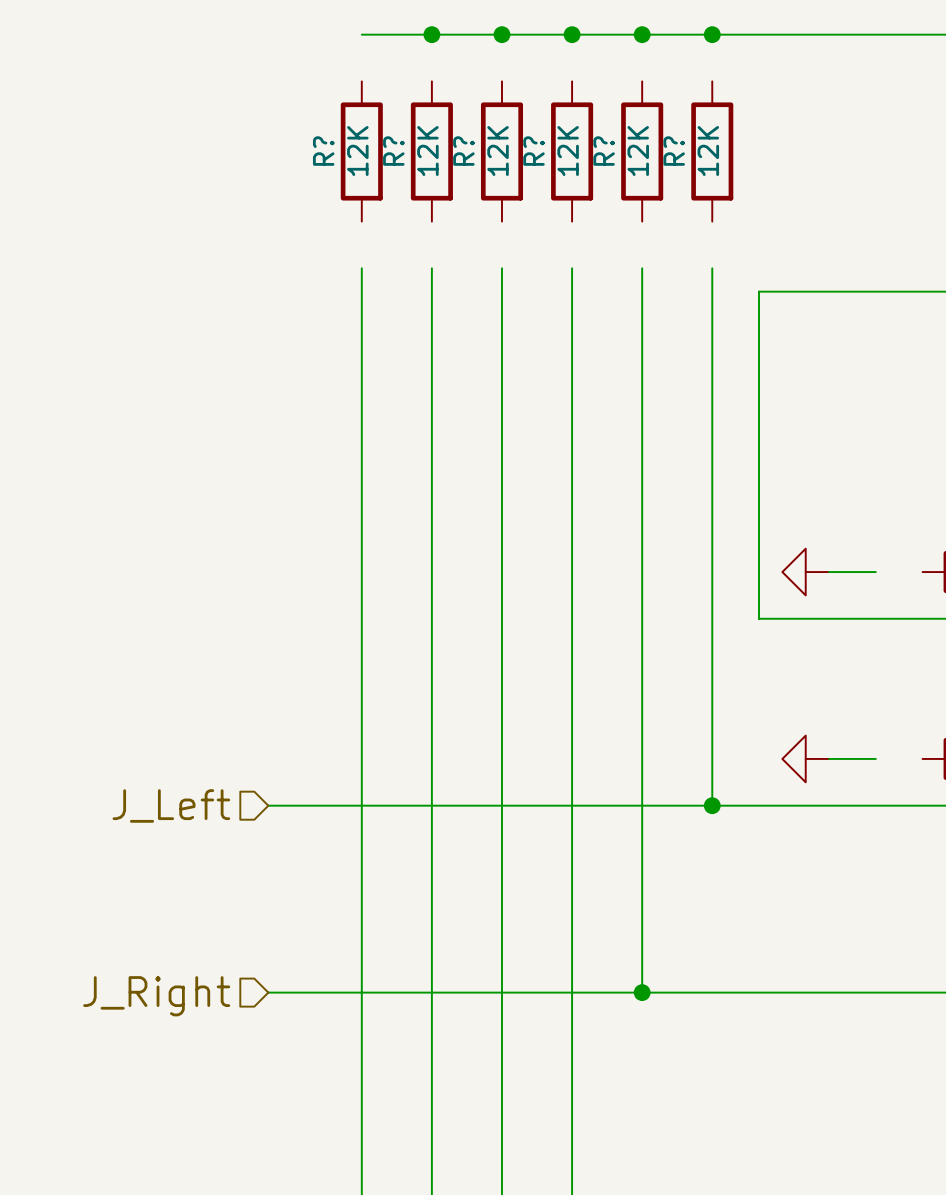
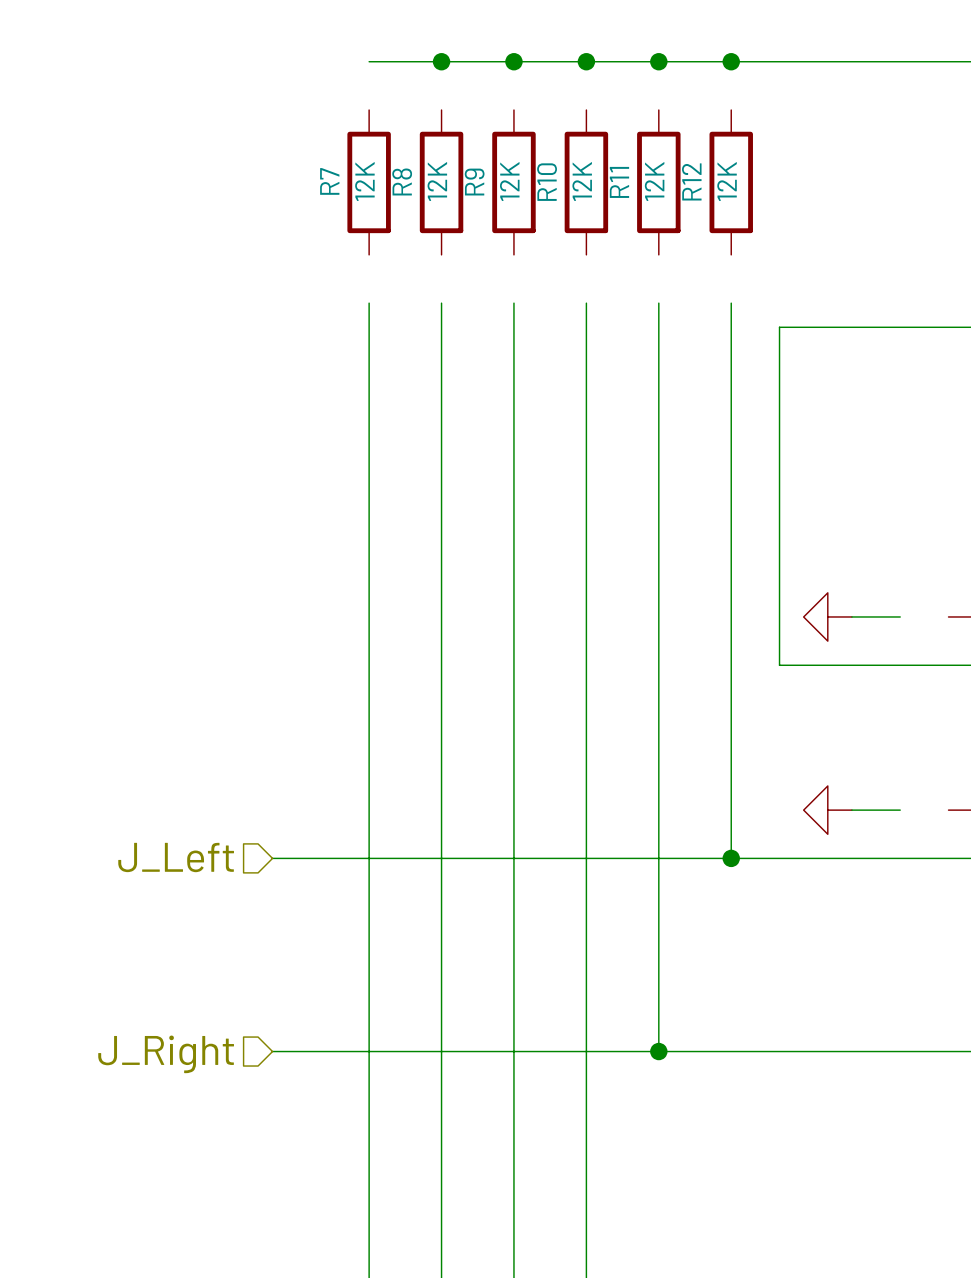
R? name: R? (323, 151) -> R7 (329, 181)
R? name: R? (393, 151) -> R8 (402, 181)
R? name: R? (463, 151) -> R9 (474, 182)
R? name: R? (534, 151) -> R10 (547, 182)
R? name: R? (604, 151) -> R11 (619, 182)
R? name: R? (674, 151) -> R12 (691, 181)

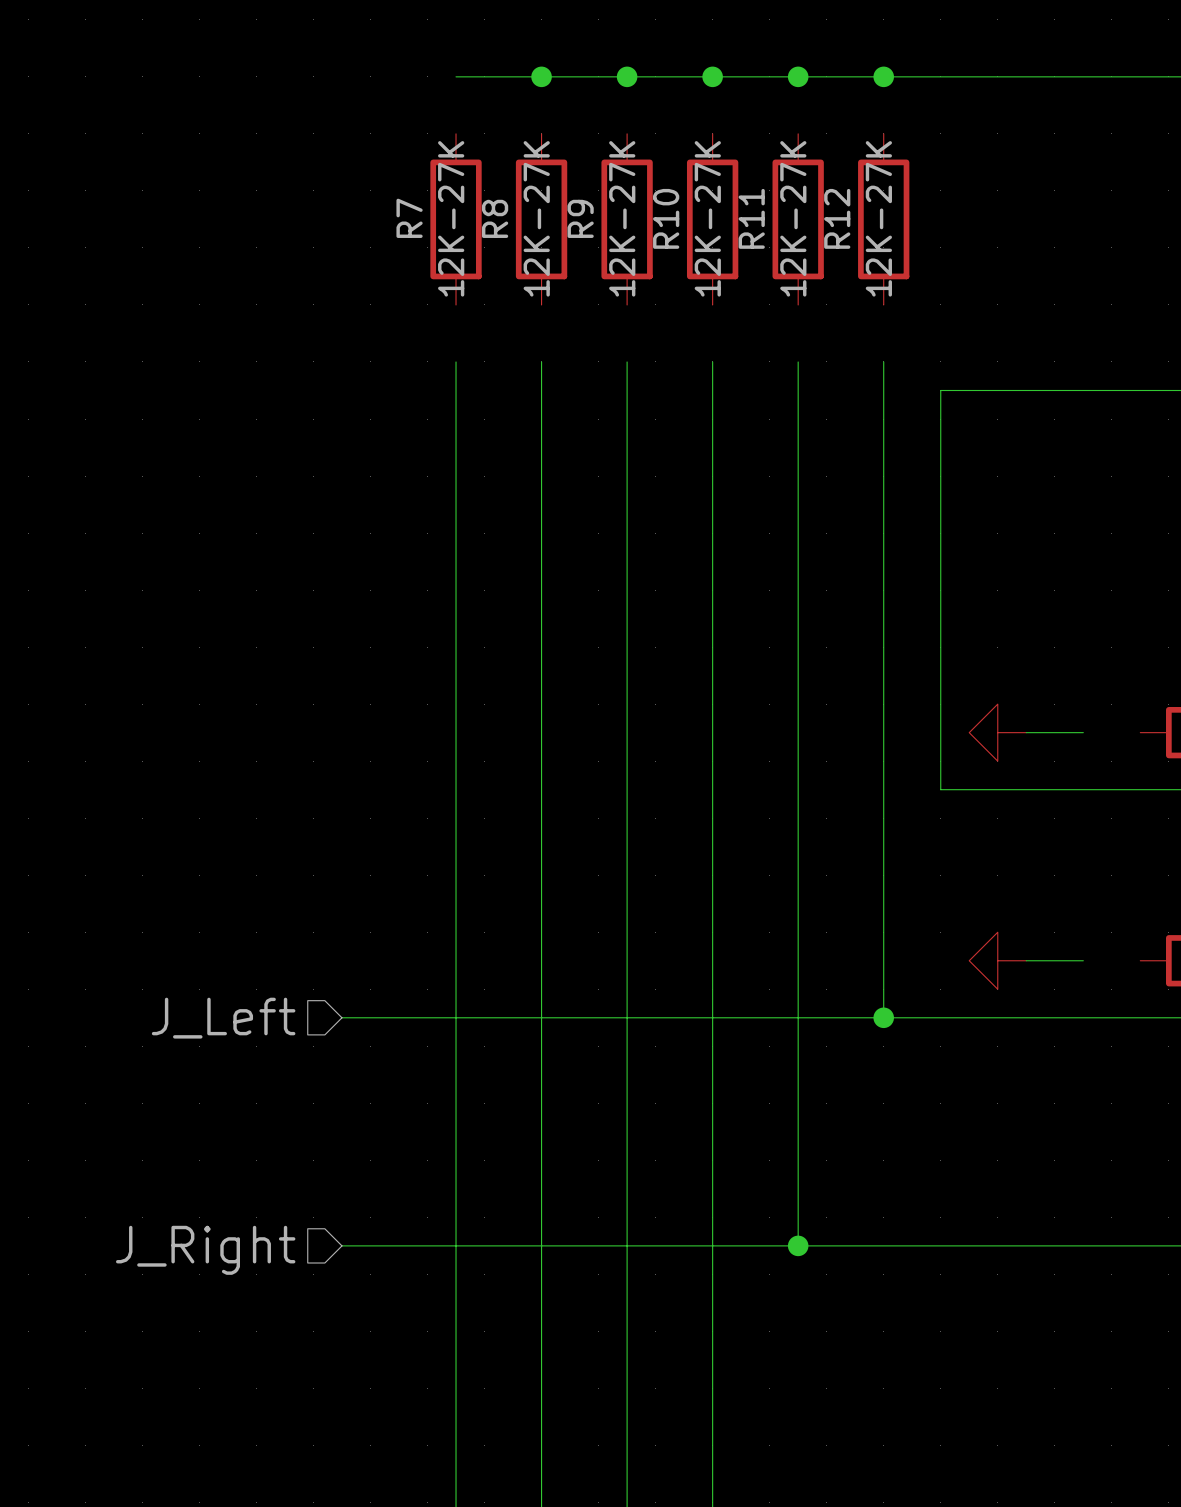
R7 value: 12K (364, 181) -> 12K-27K (451, 218)
R8 value: 12K (437, 181) -> 12K-27K (536, 218)
R9 value: 12K (509, 181) -> 12K-27K (622, 218)
R10 value: 12K (582, 181) -> 12K-27K (707, 218)
R11 value: 12K (654, 181) -> 12K-27K (793, 218)
R12 value: 12K (727, 181) -> 12K-27K (878, 218)

